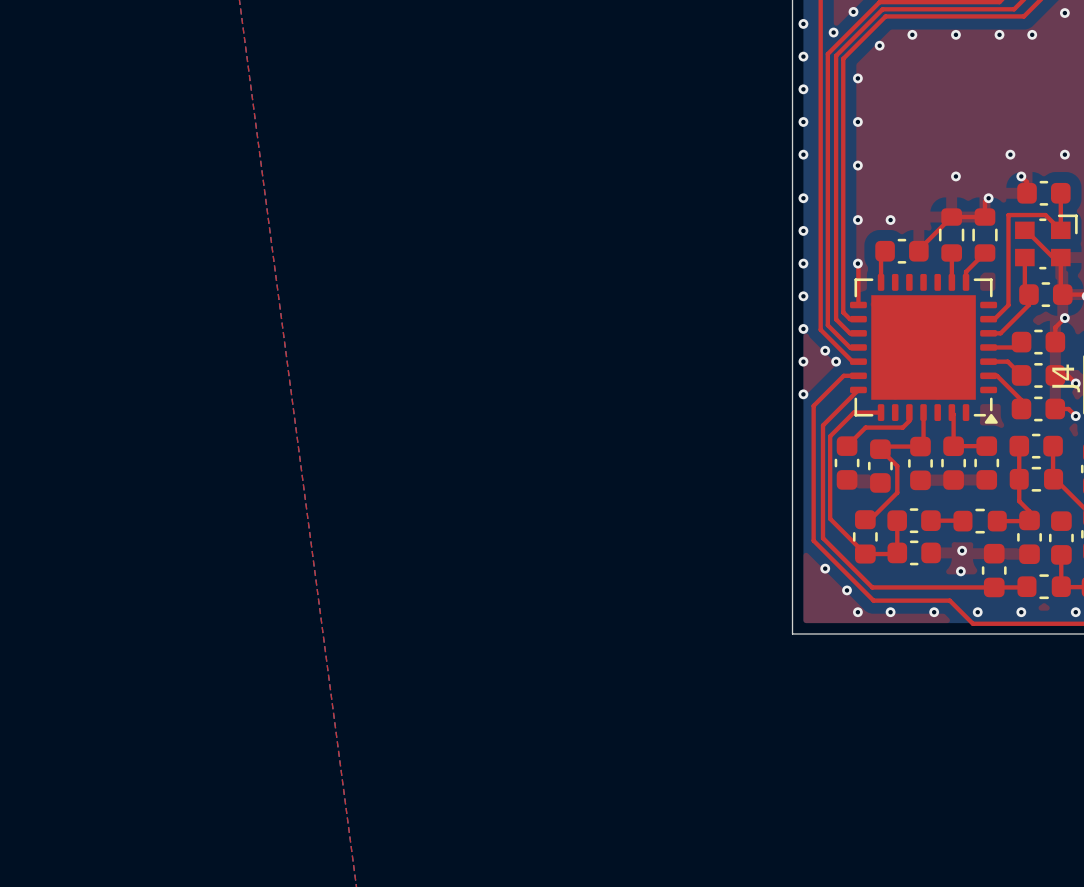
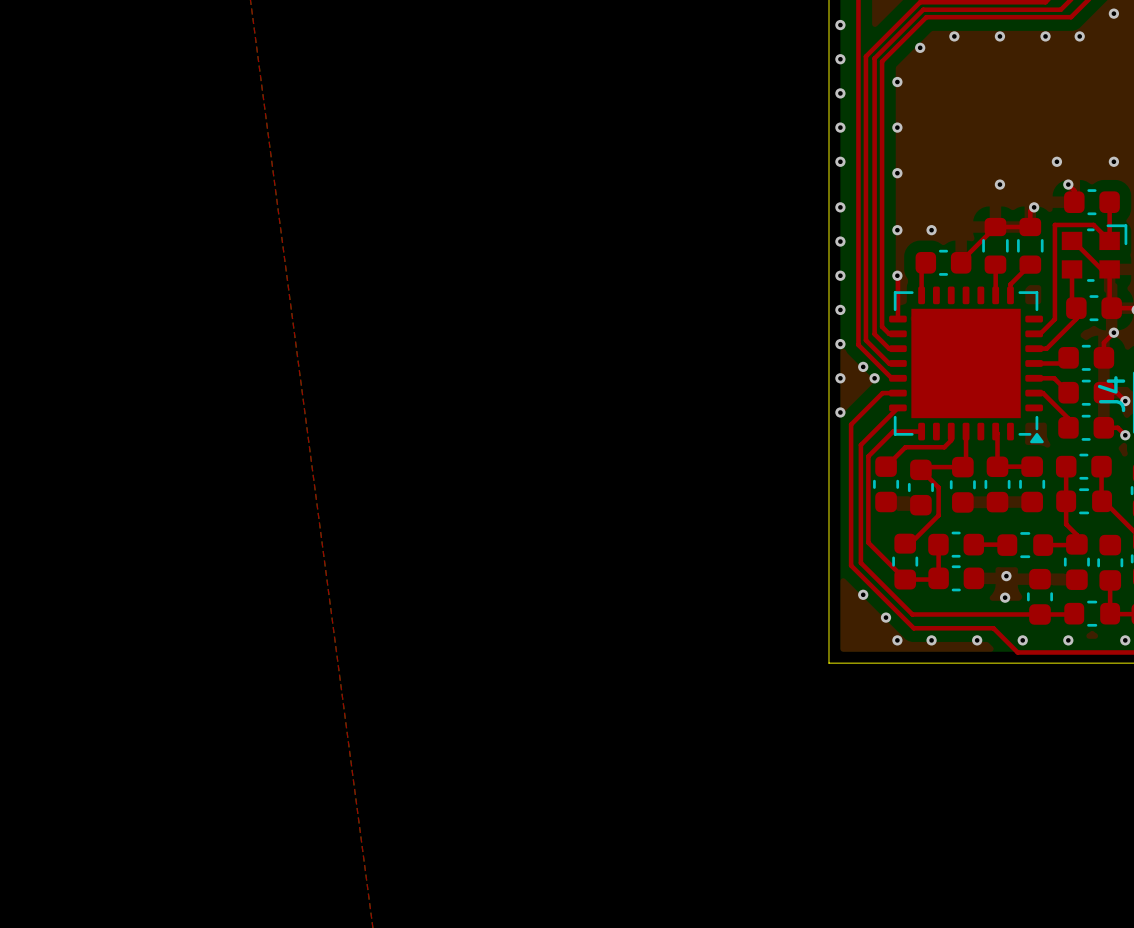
via: (853, 11) -> none
via: (833, 32) -> none

